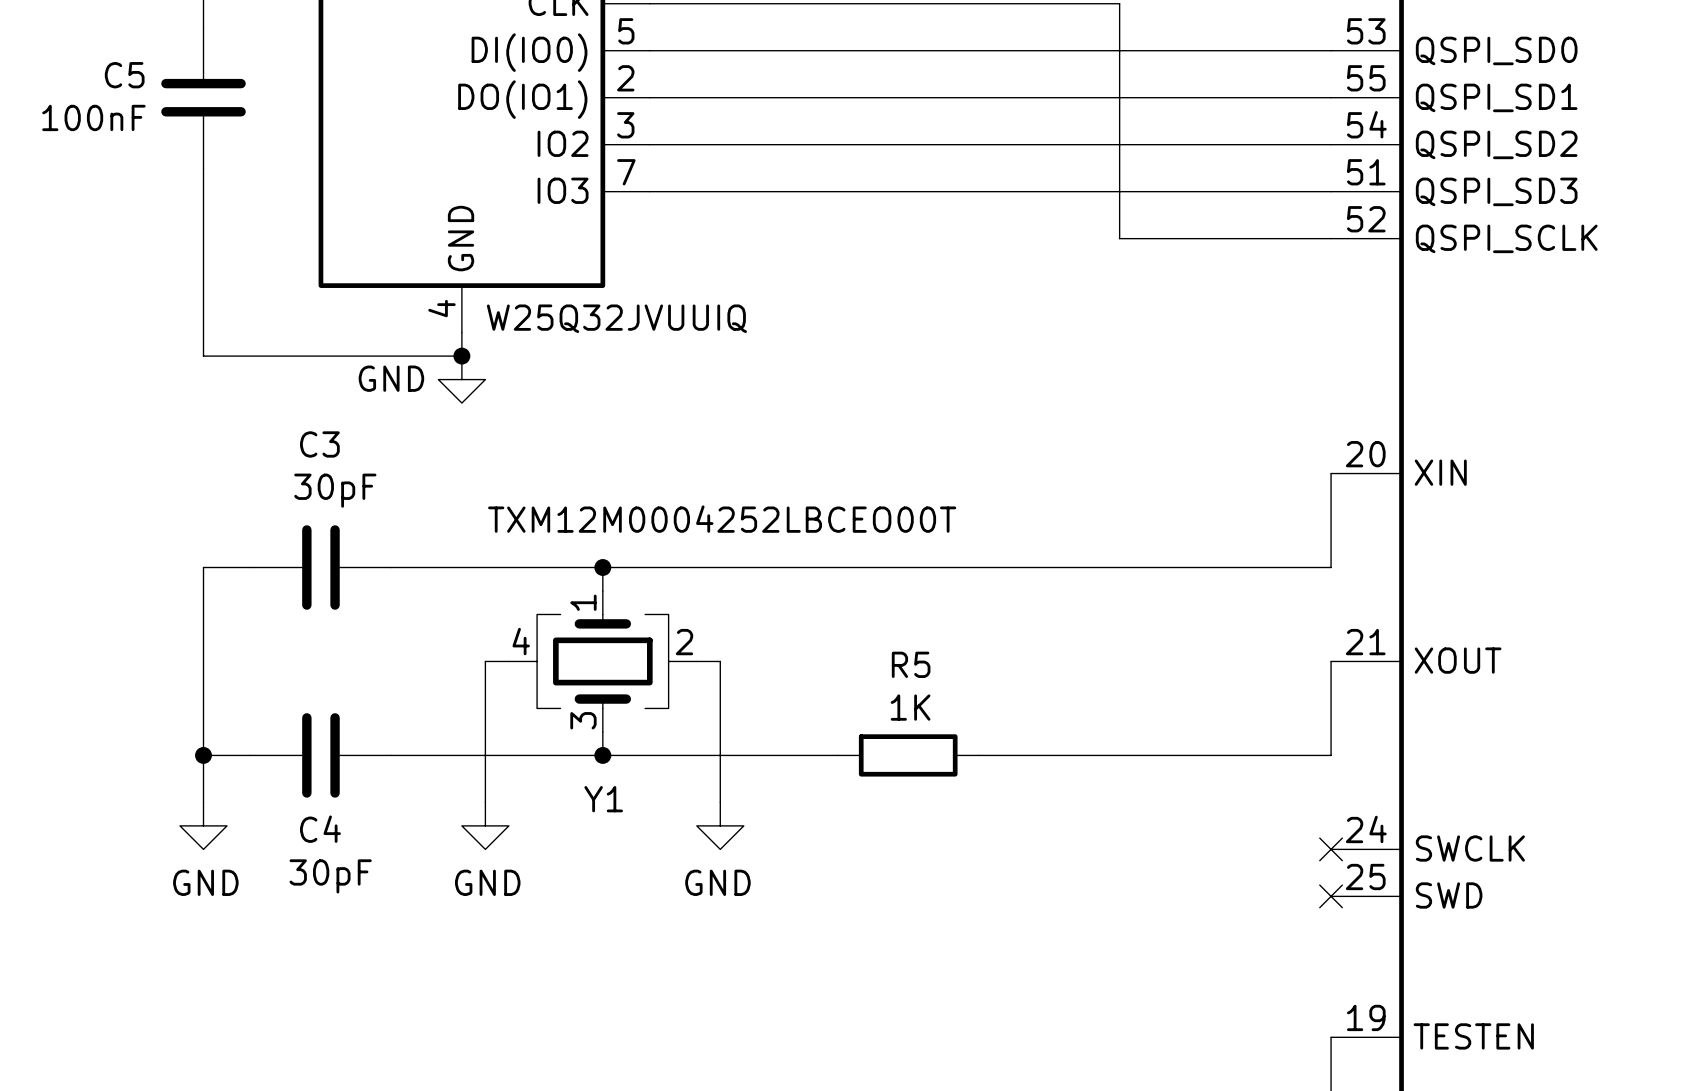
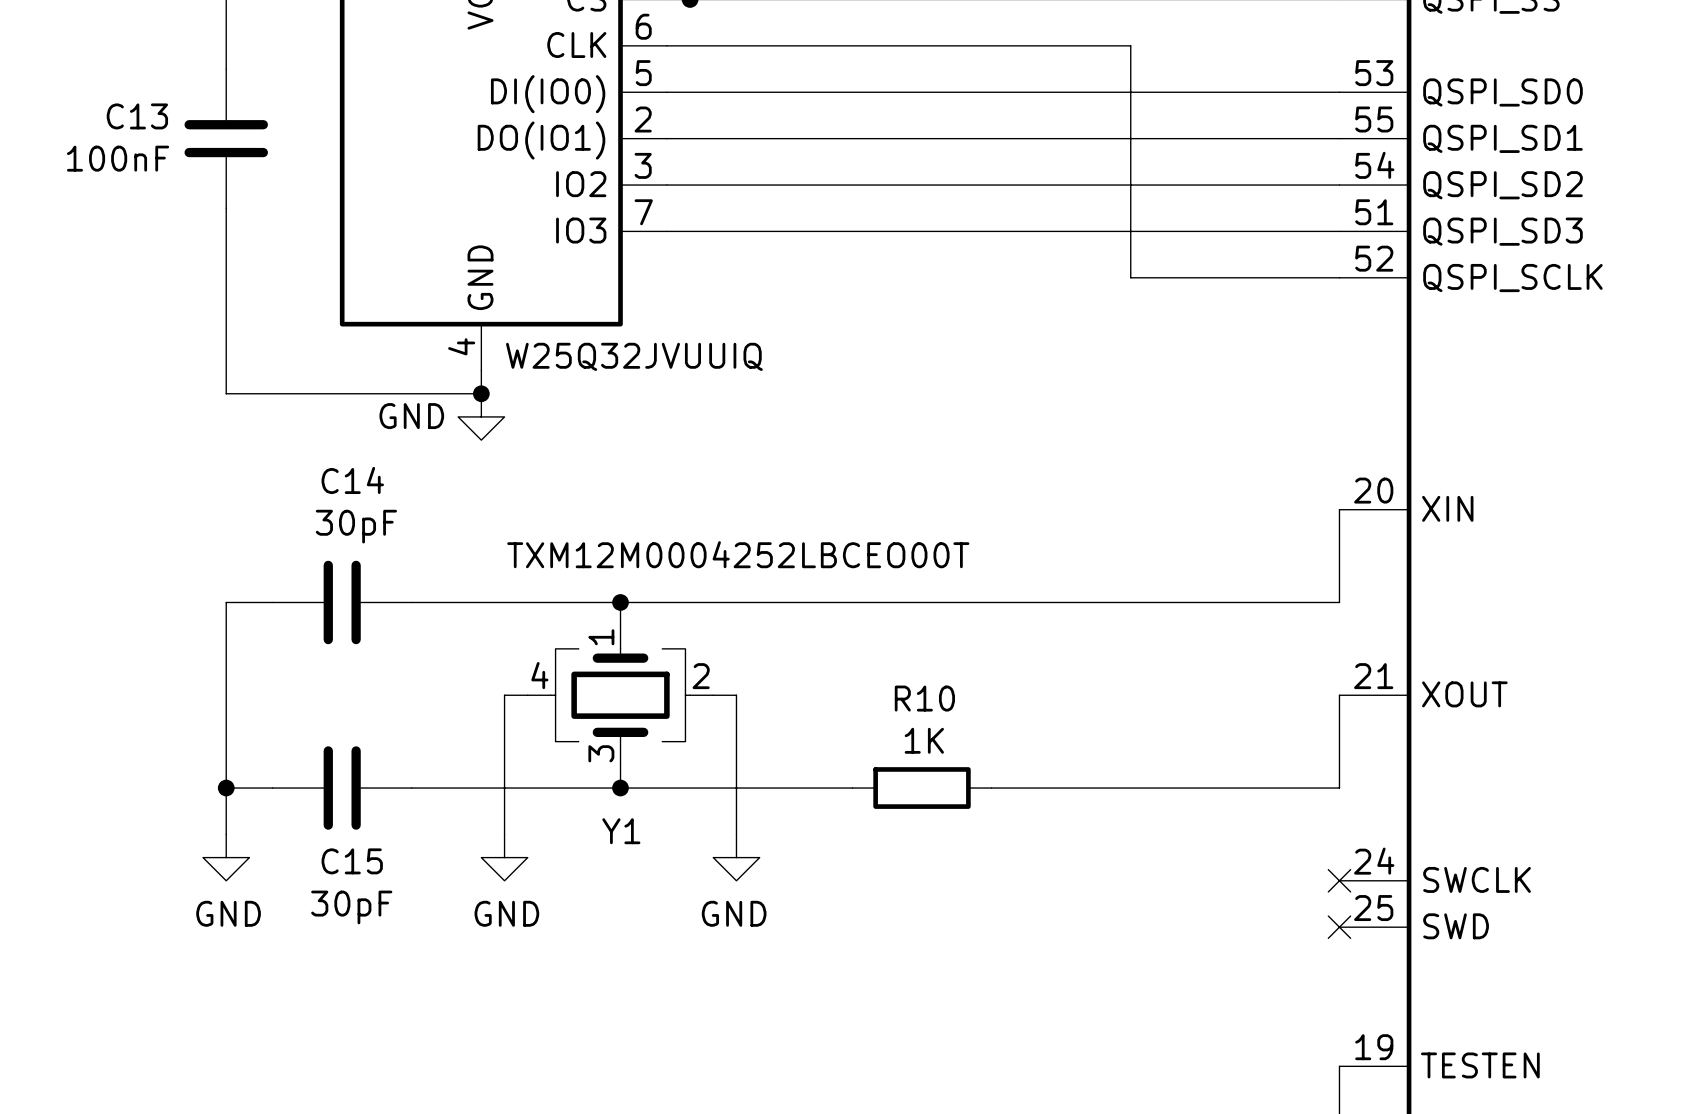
C5 name: C5 (124, 75) -> C13 (137, 116)
C3 name: C3 (319, 444) -> C14 (352, 480)
R5 name: R5 (911, 664) -> R10 (924, 698)
C4 name: C4 (320, 829) -> C15 (352, 861)

